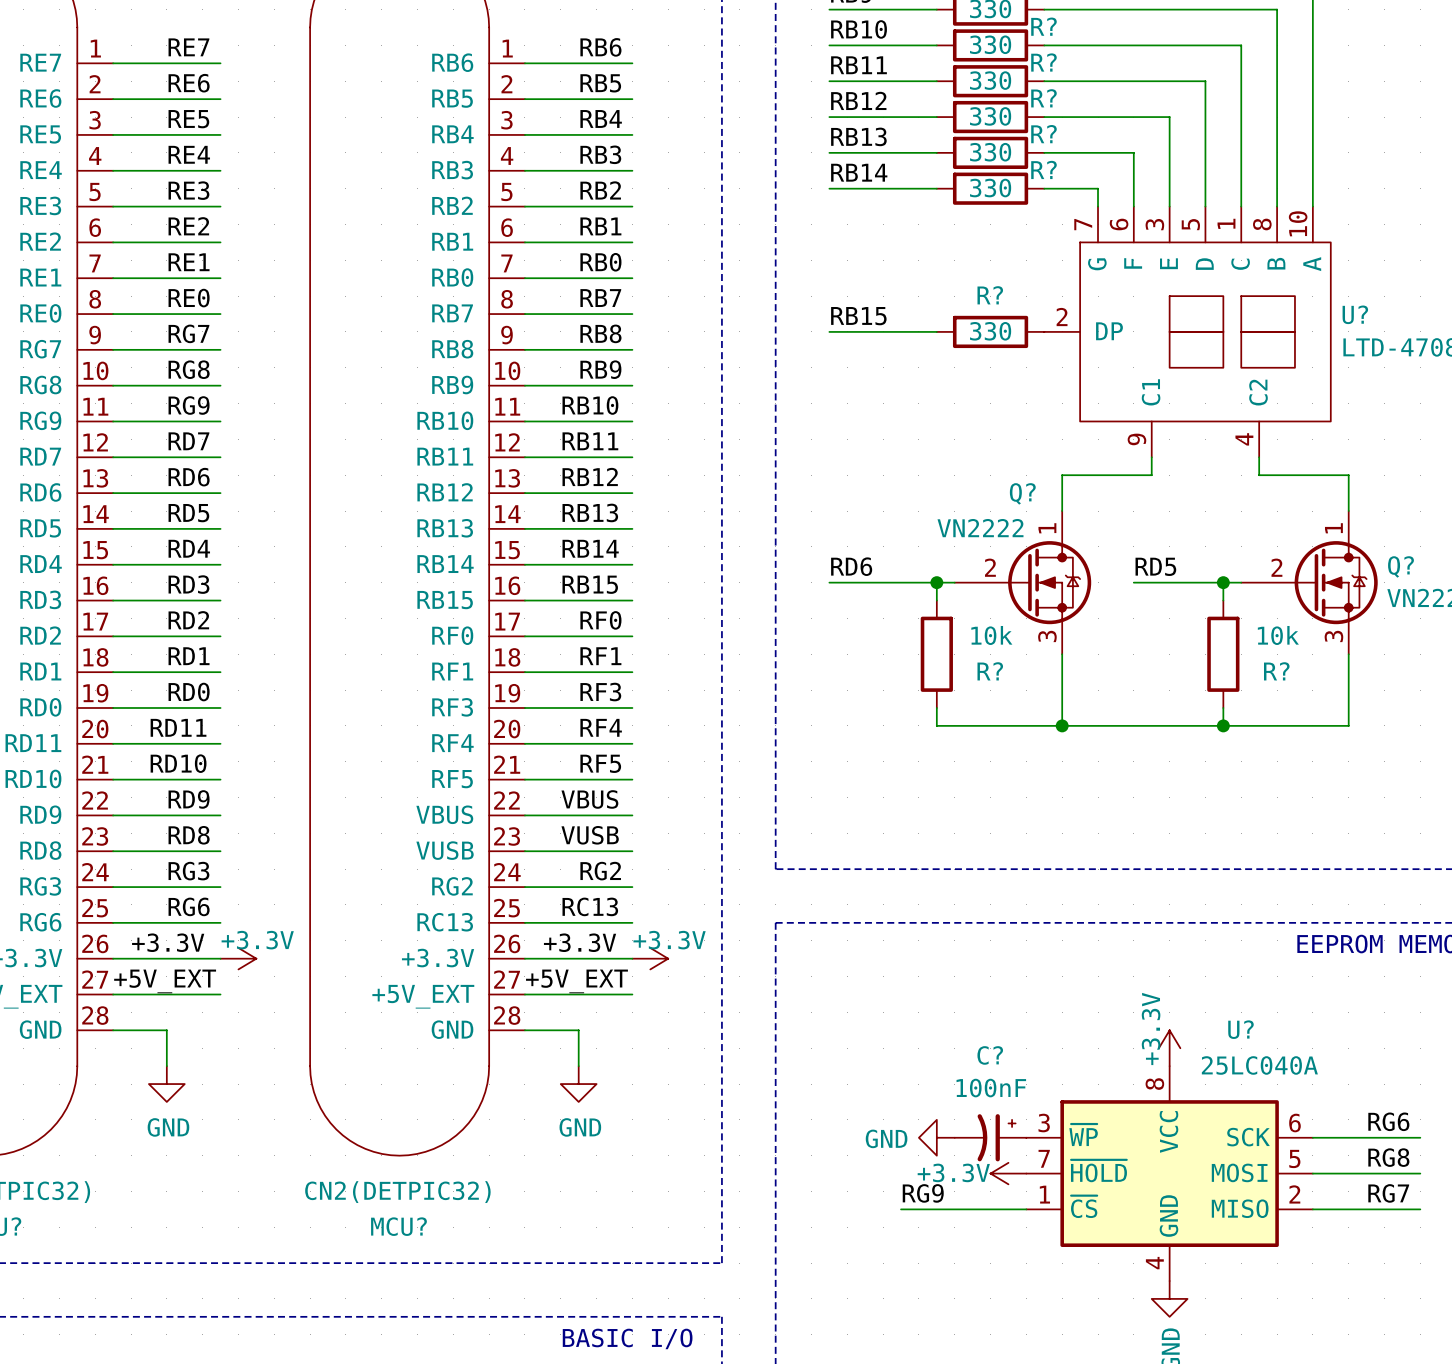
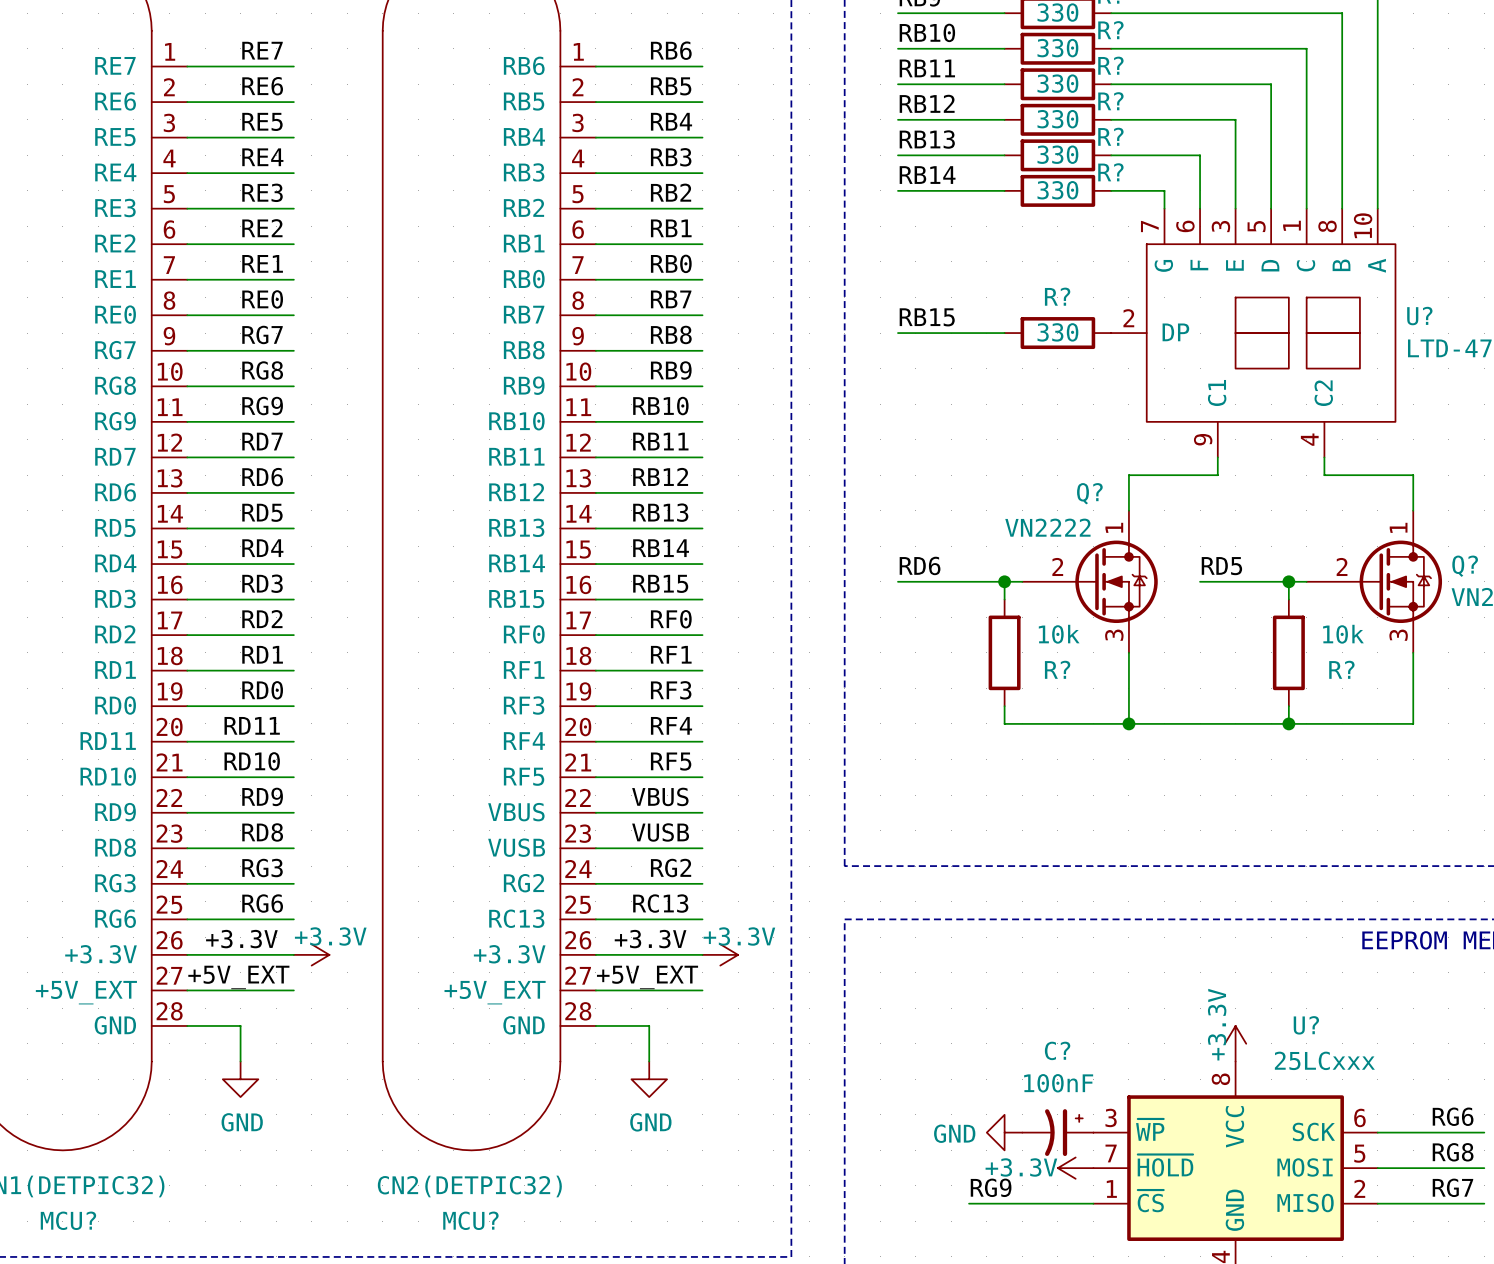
U? value: 25LC040A (1259, 1065) -> 25LCxxx (1324, 1060)

